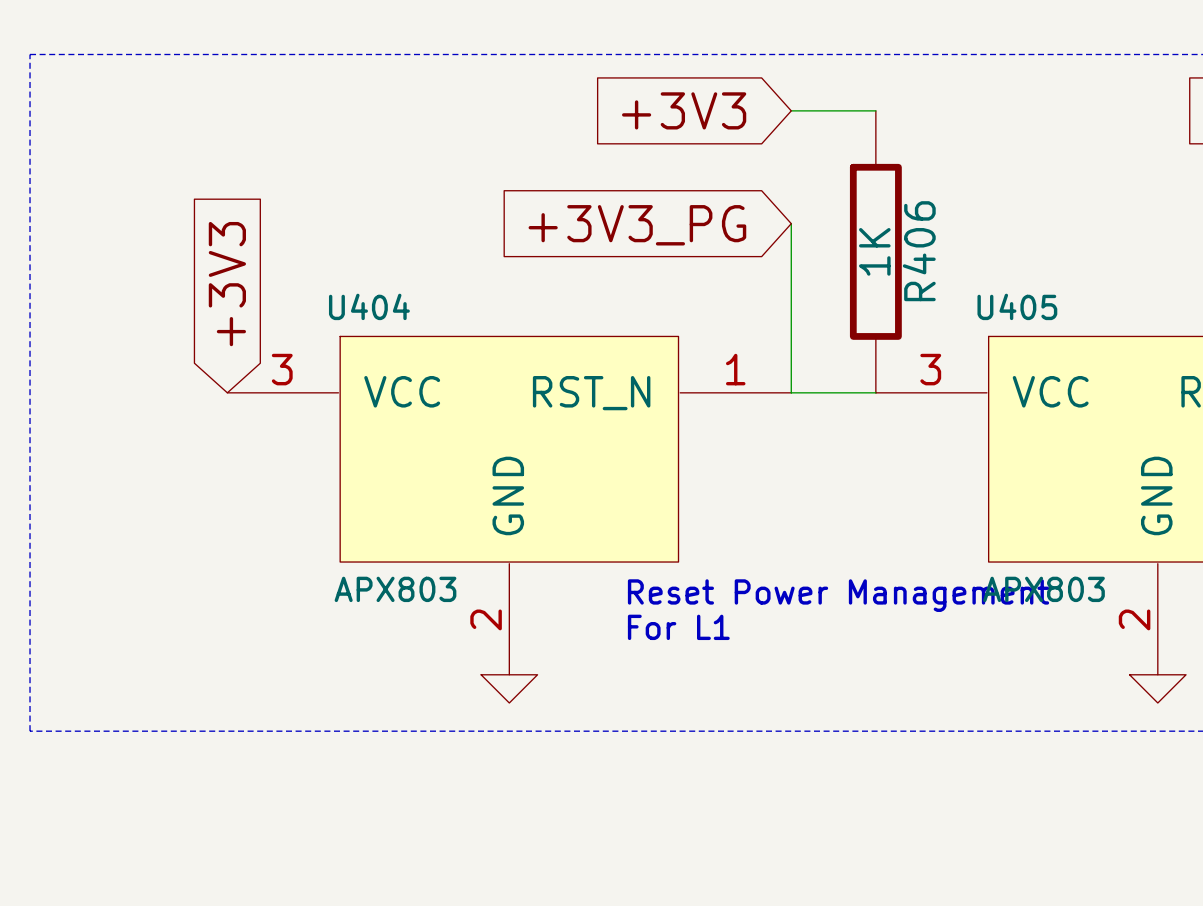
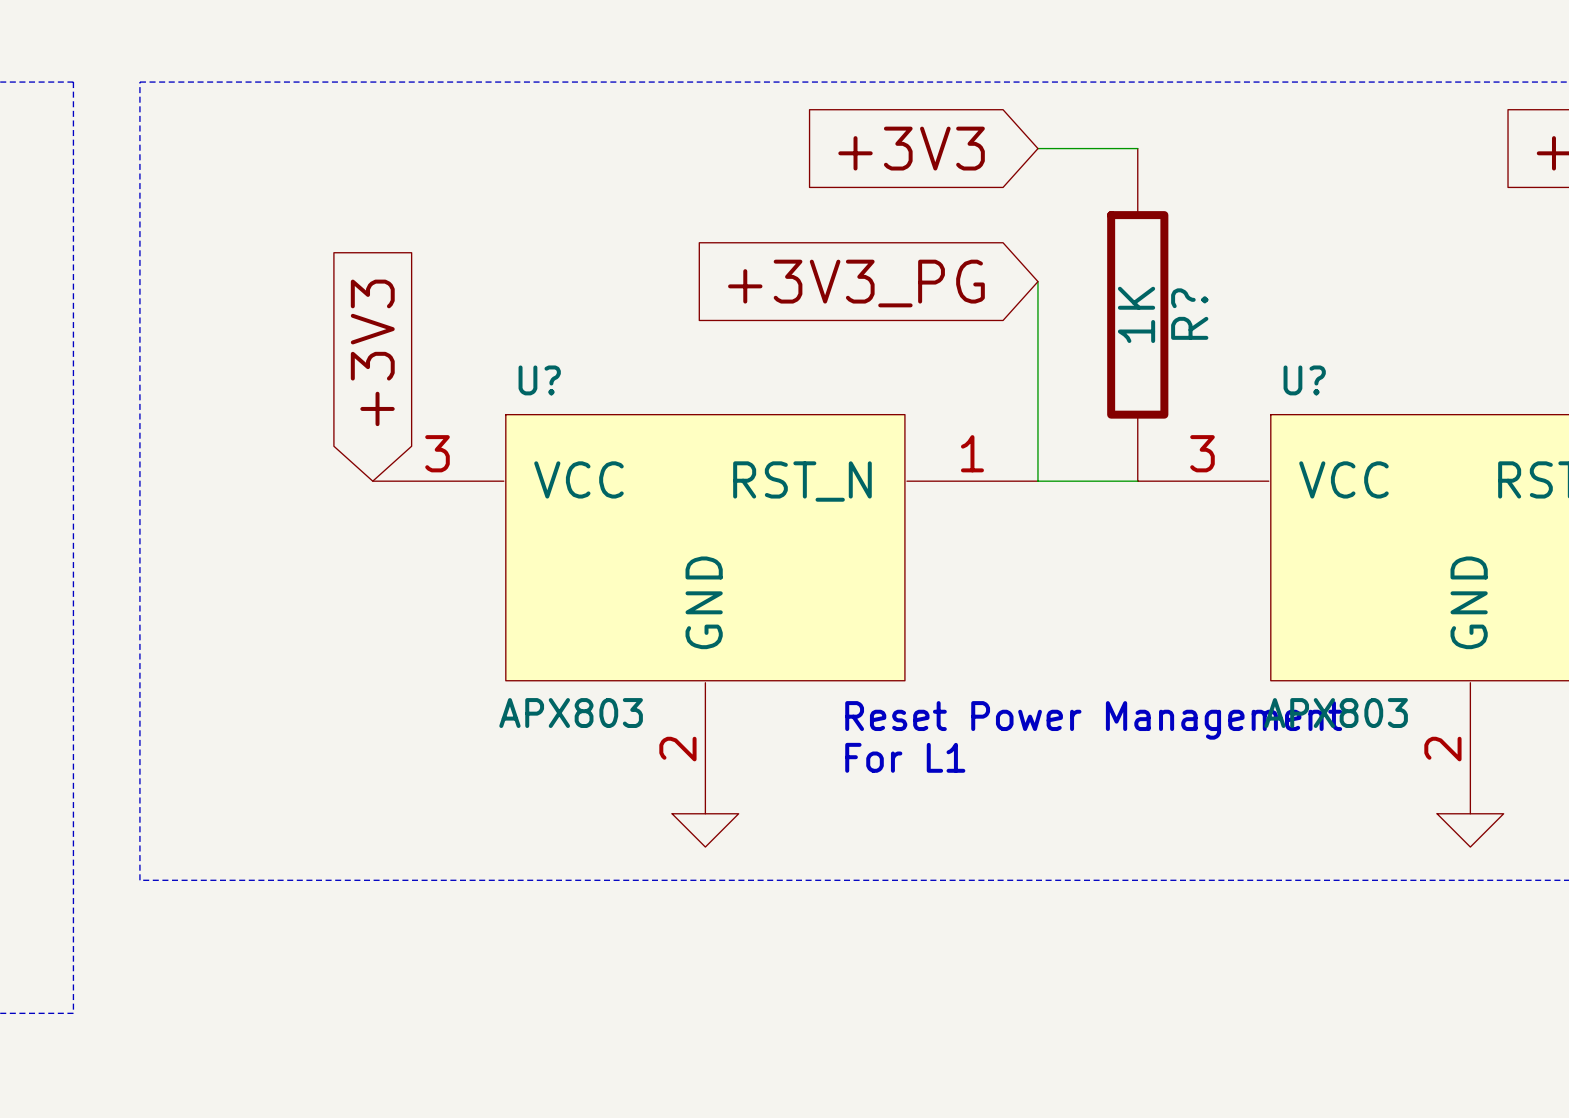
R406 name: R406 (919, 251) -> R? (1189, 314)
U404 name: U404 (369, 306) -> U? (539, 380)
U405 name: U405 (1017, 306) -> U? (1304, 380)

